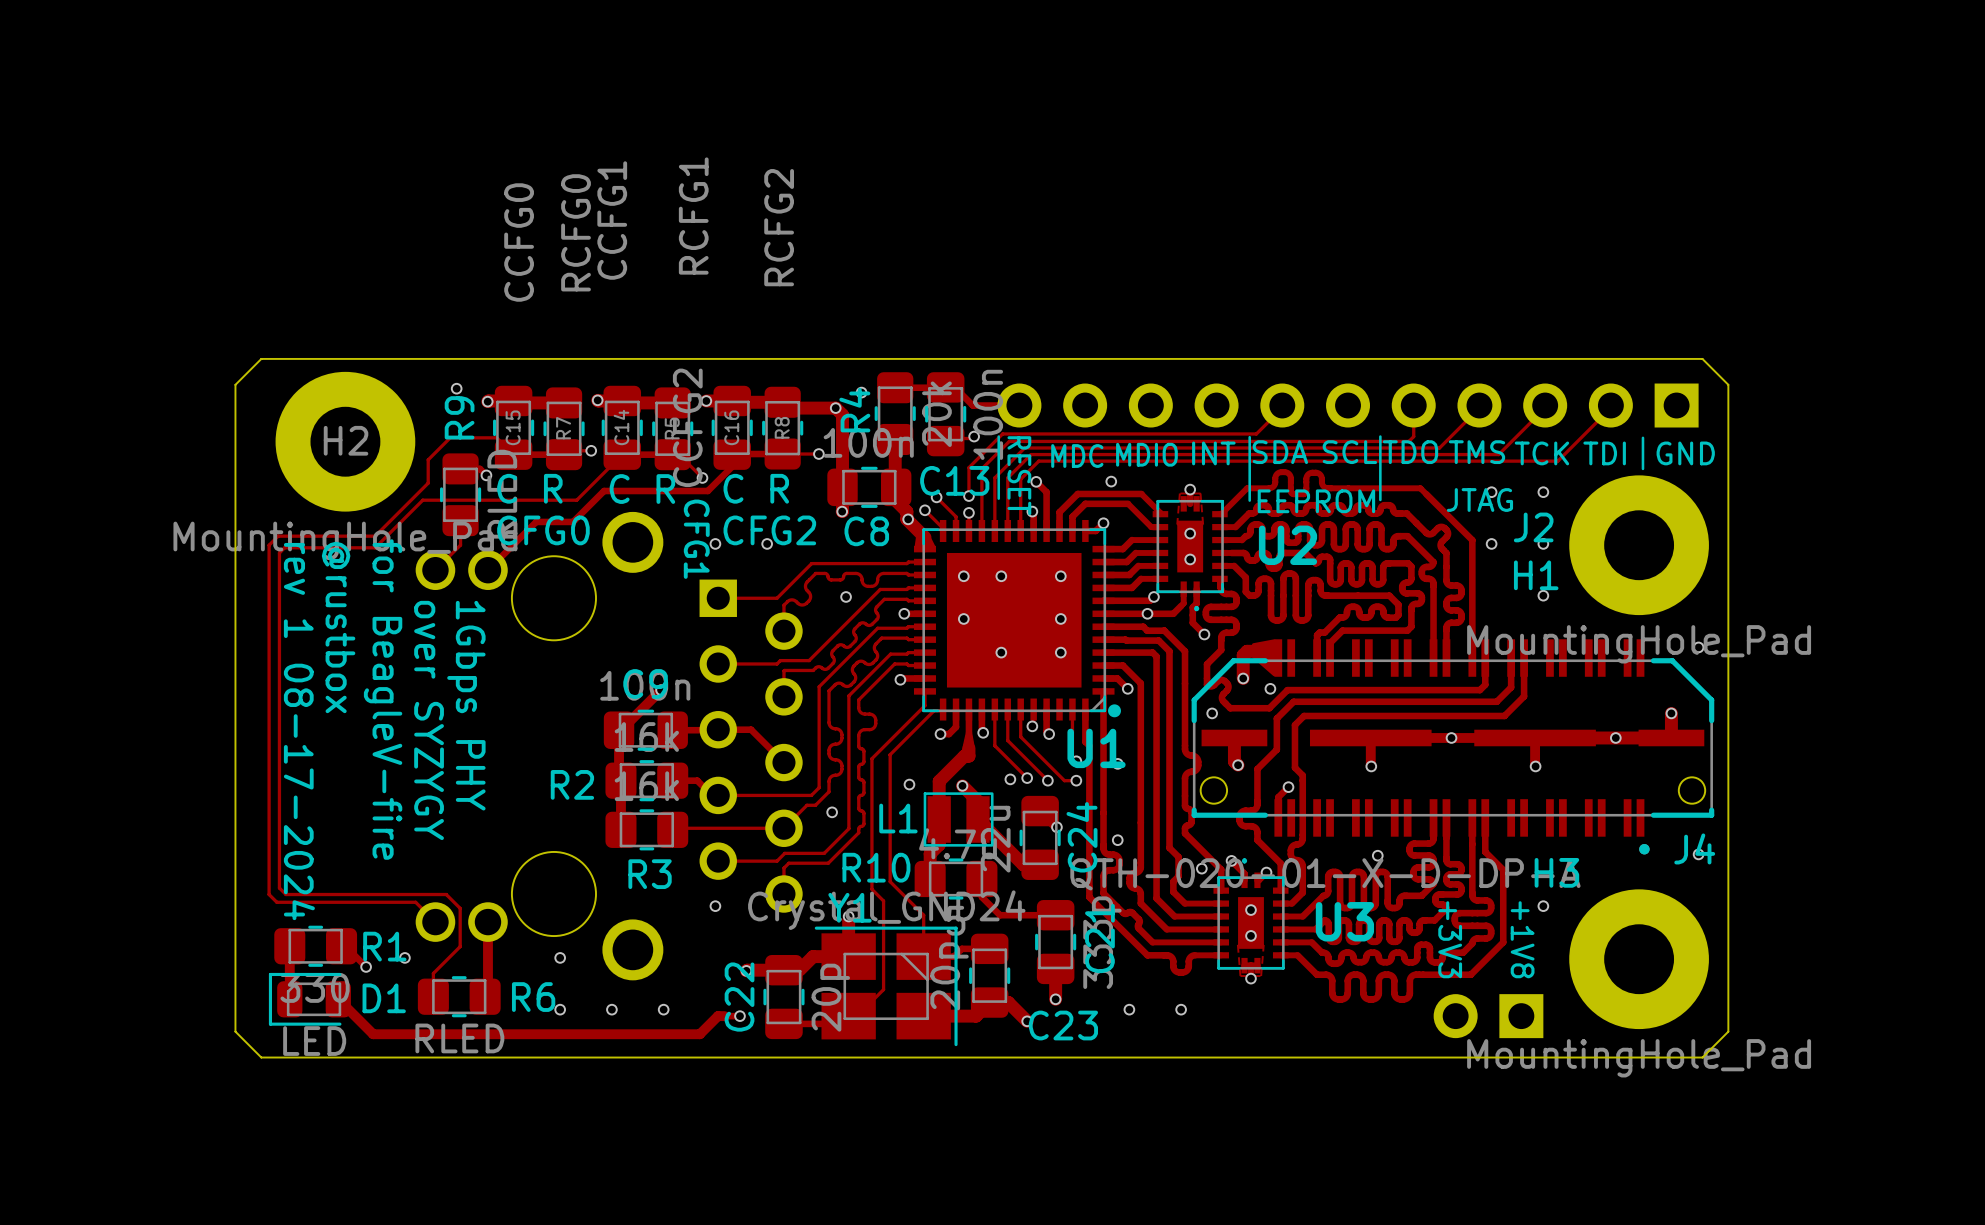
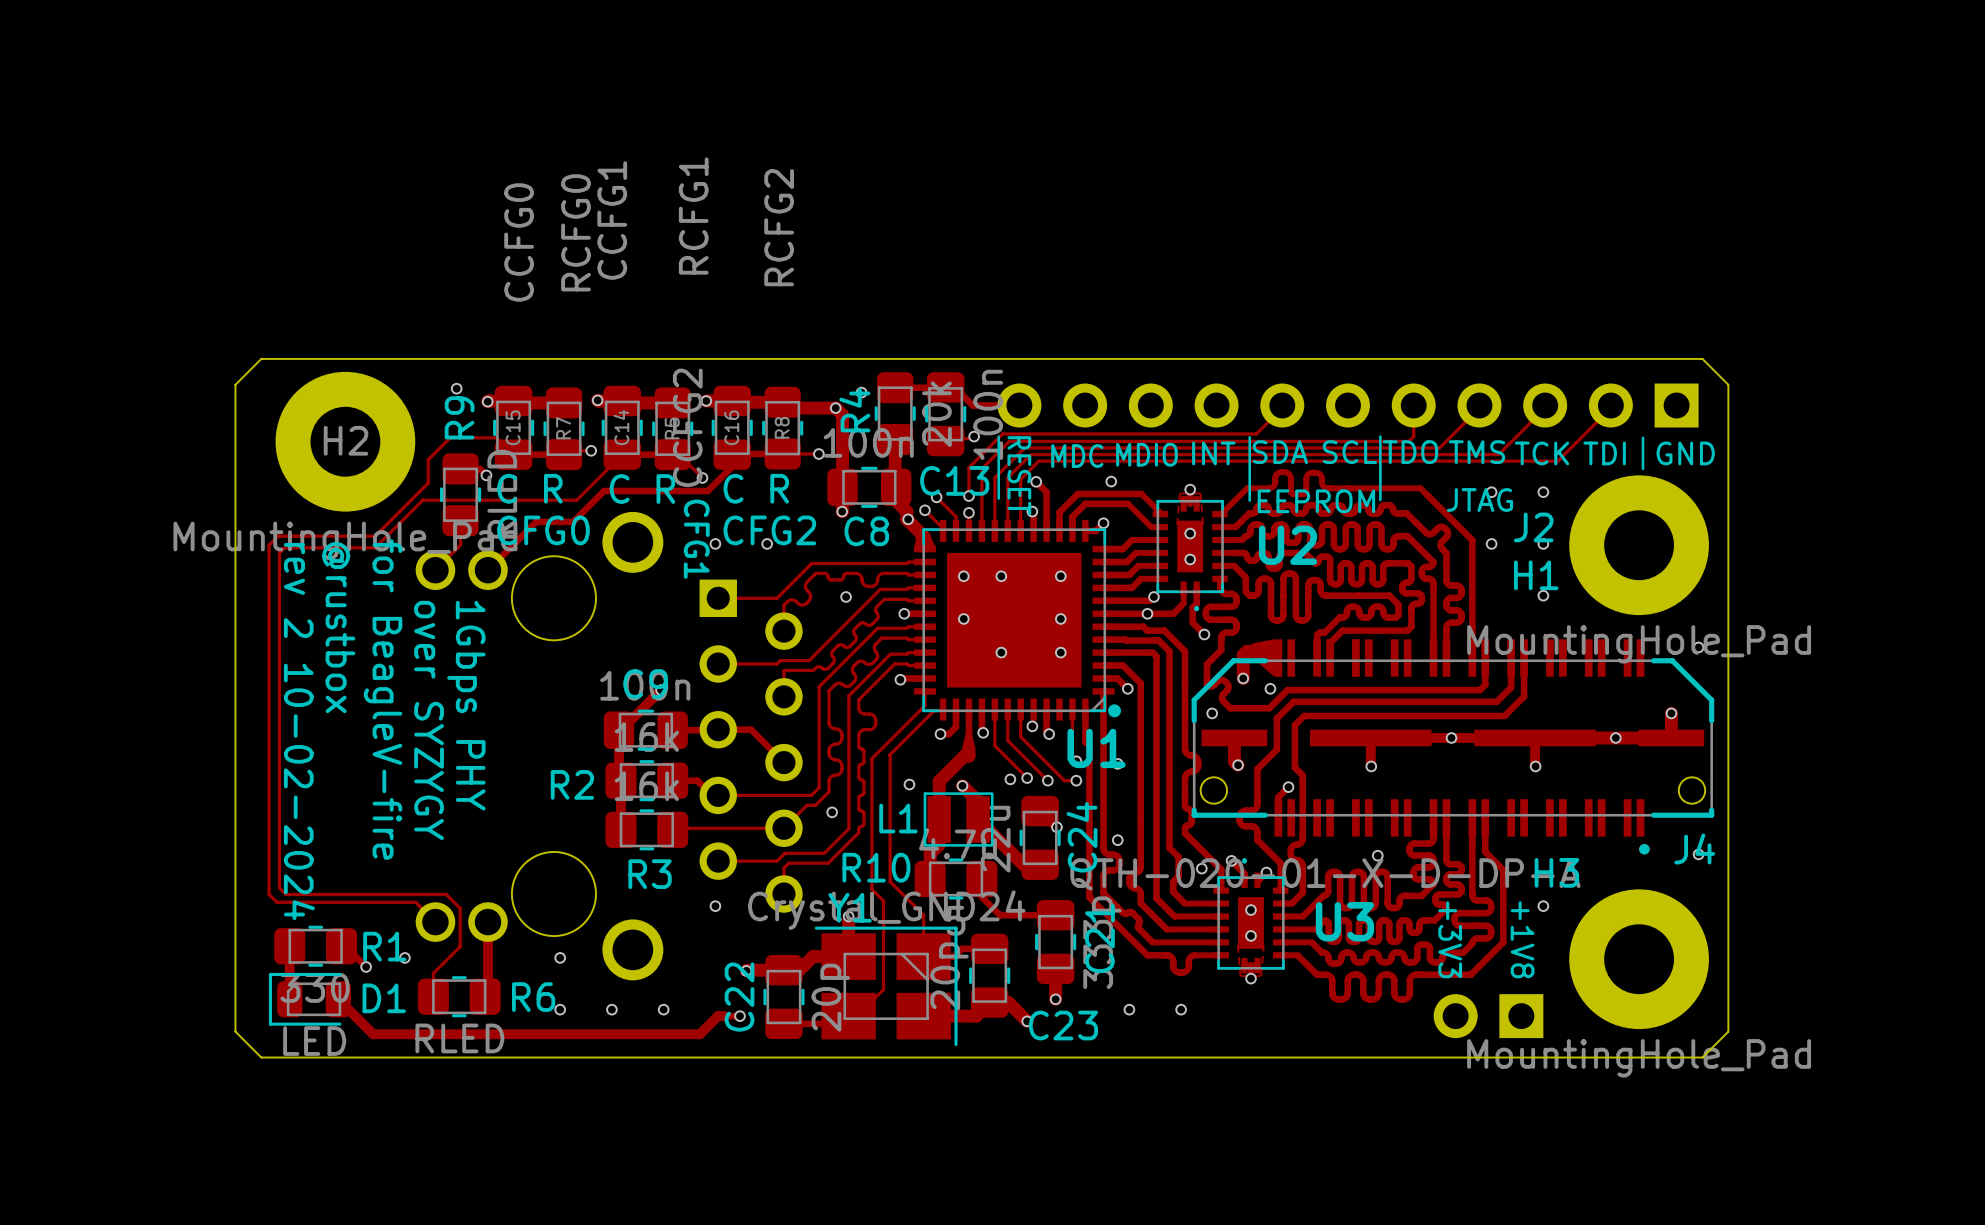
text: rev 1 08-17-2024 (299, 731) -> rev 2 10-02-2024 (299, 731)

